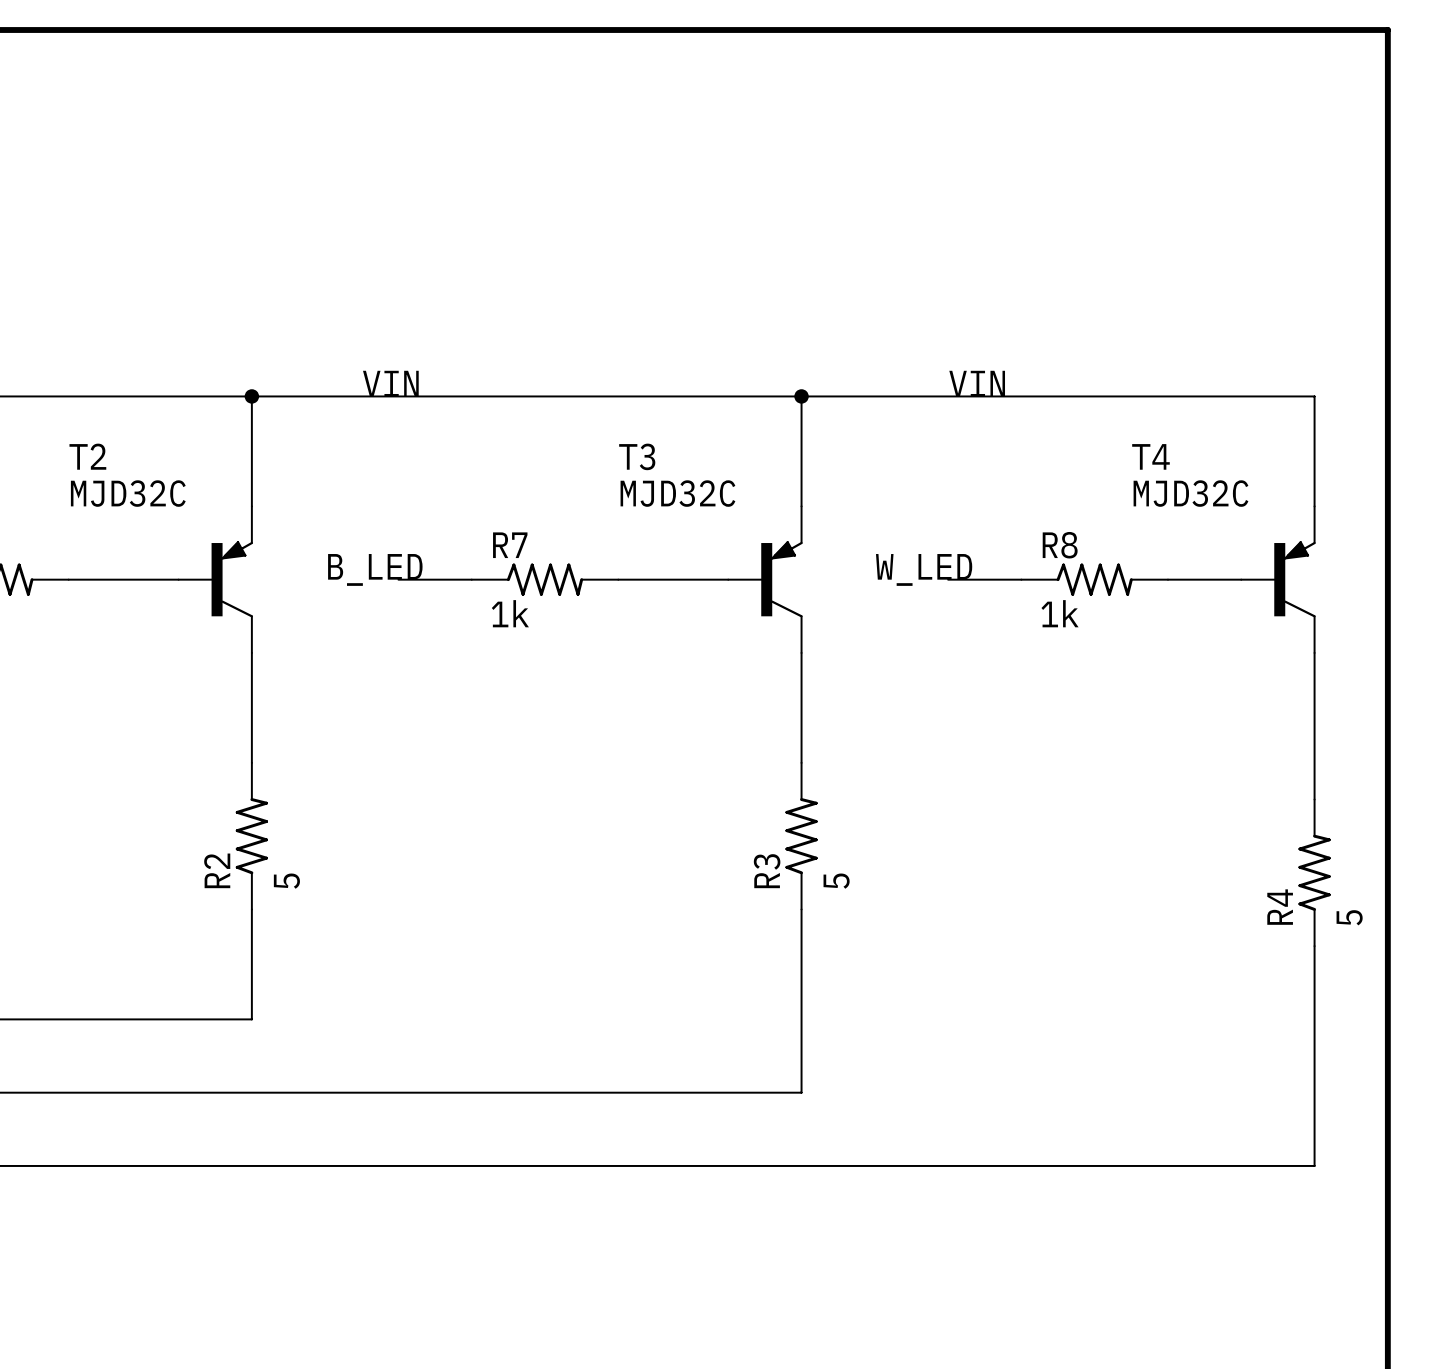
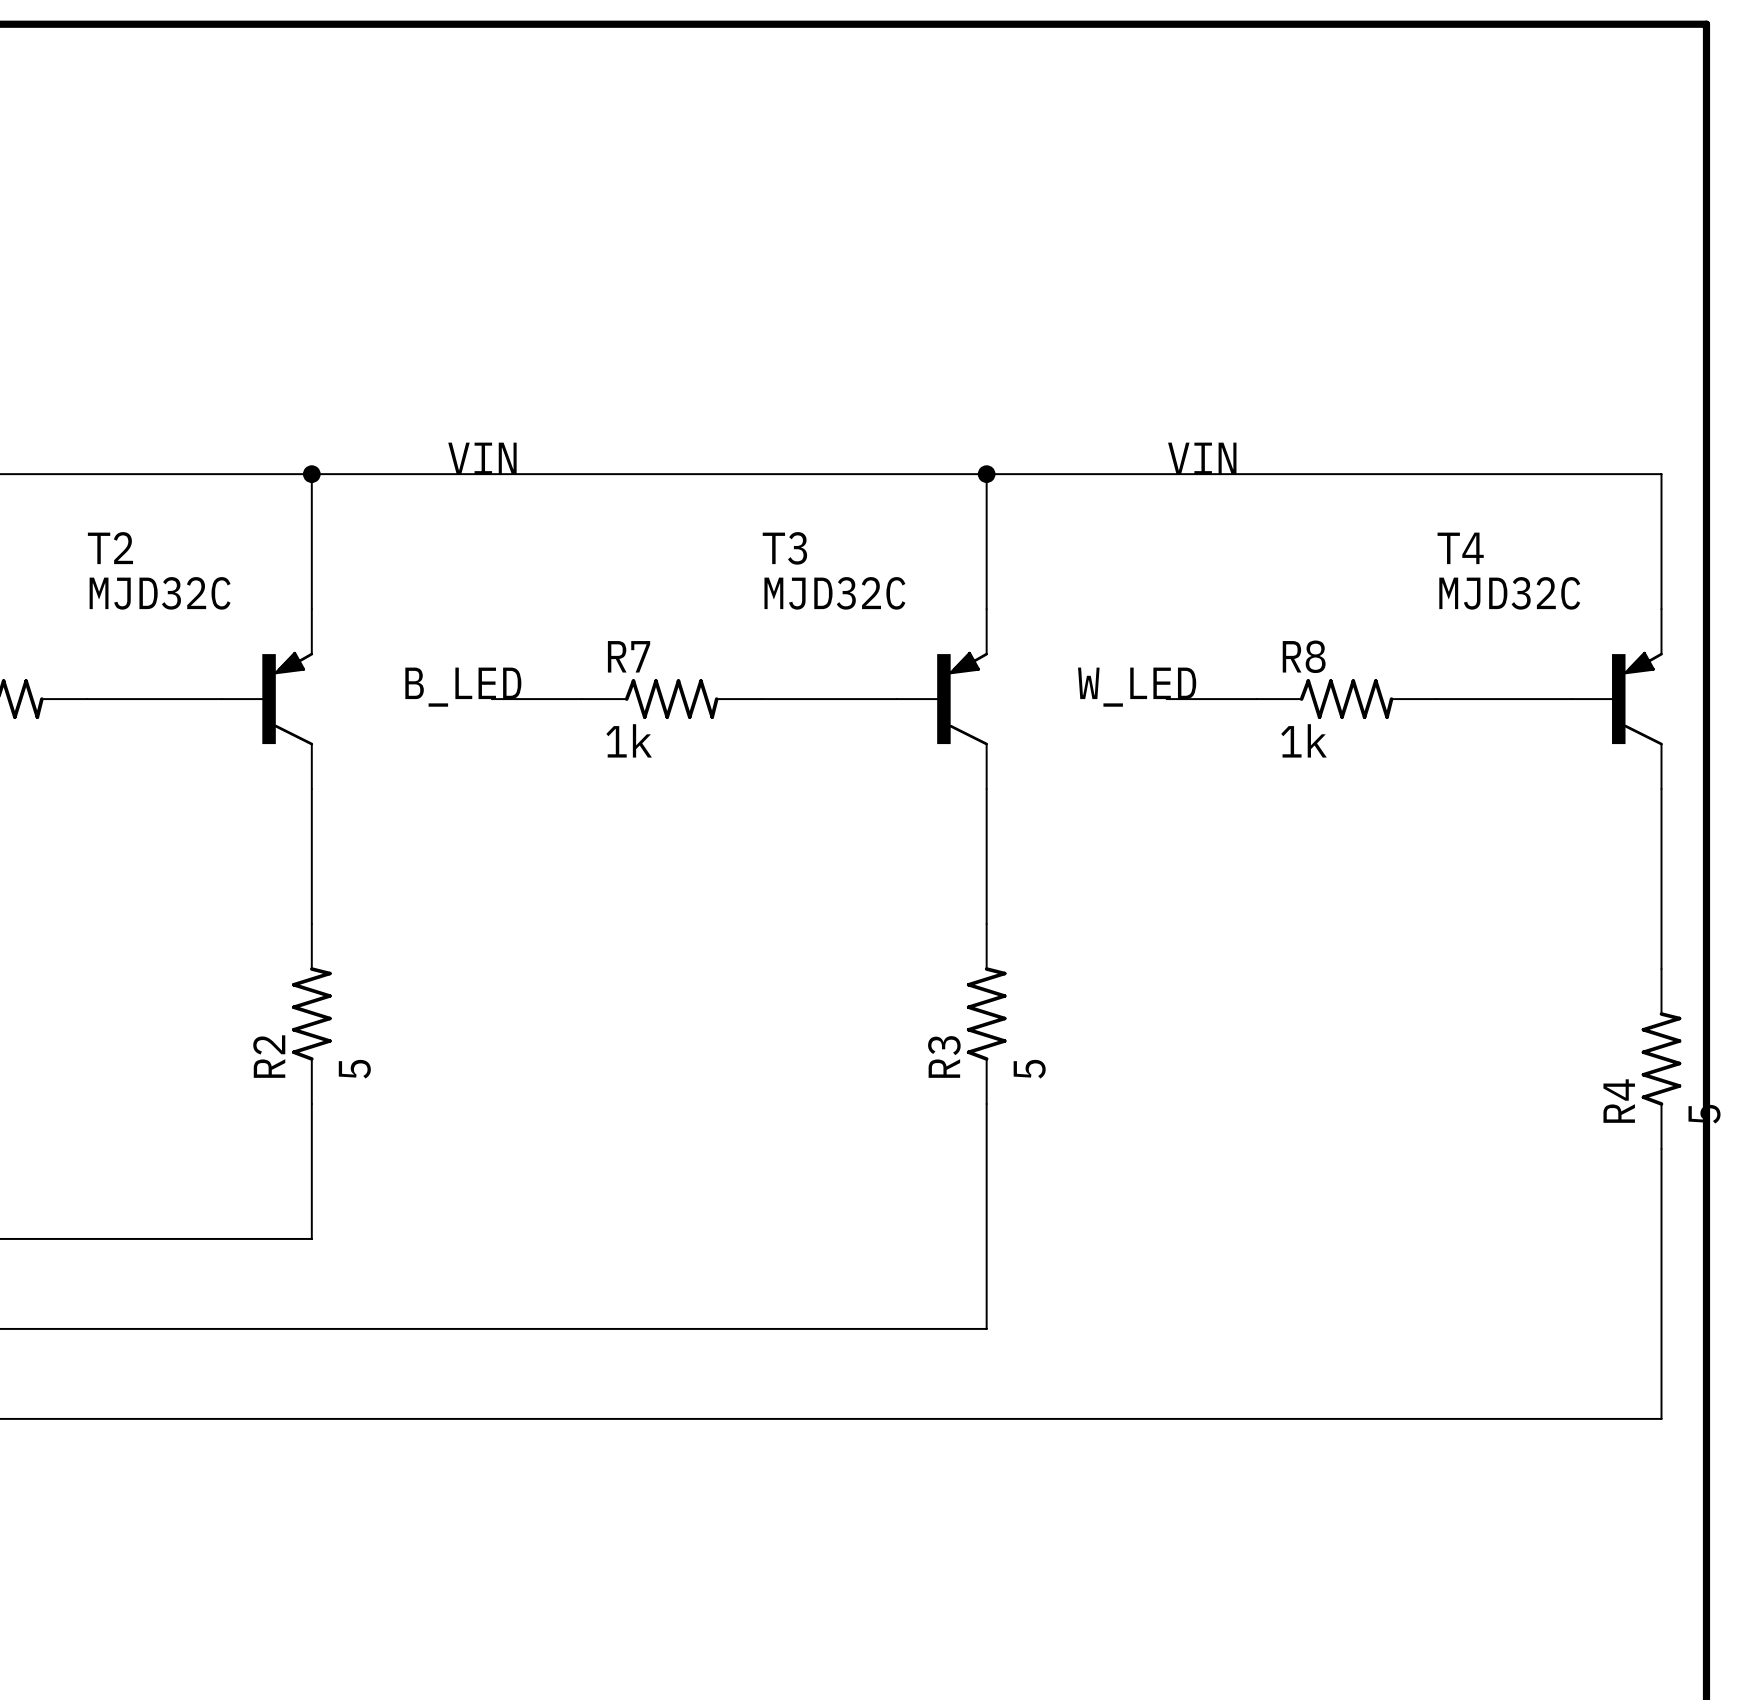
wire: (1314, 396) (1314, 506) -> (1616, 474) (1661, 474) (1661, 609)
T4 position: (1278, 579) -> (1617, 699)
wire: (1314, 652) (1314, 799) -> (1661, 789) (1661, 969)
R4 position: (1314, 872) -> (1661, 1059)
wire: (1314, 946) (1314, 1165) -> (1661, 1148) (1661, 1418) (1616, 1418)

